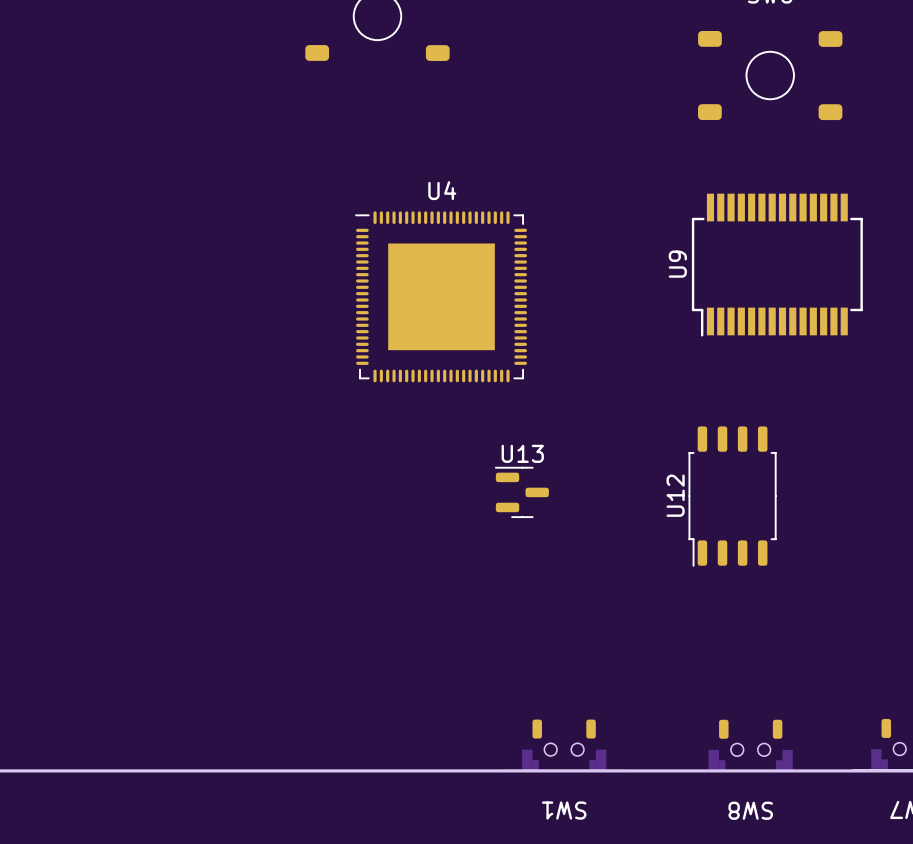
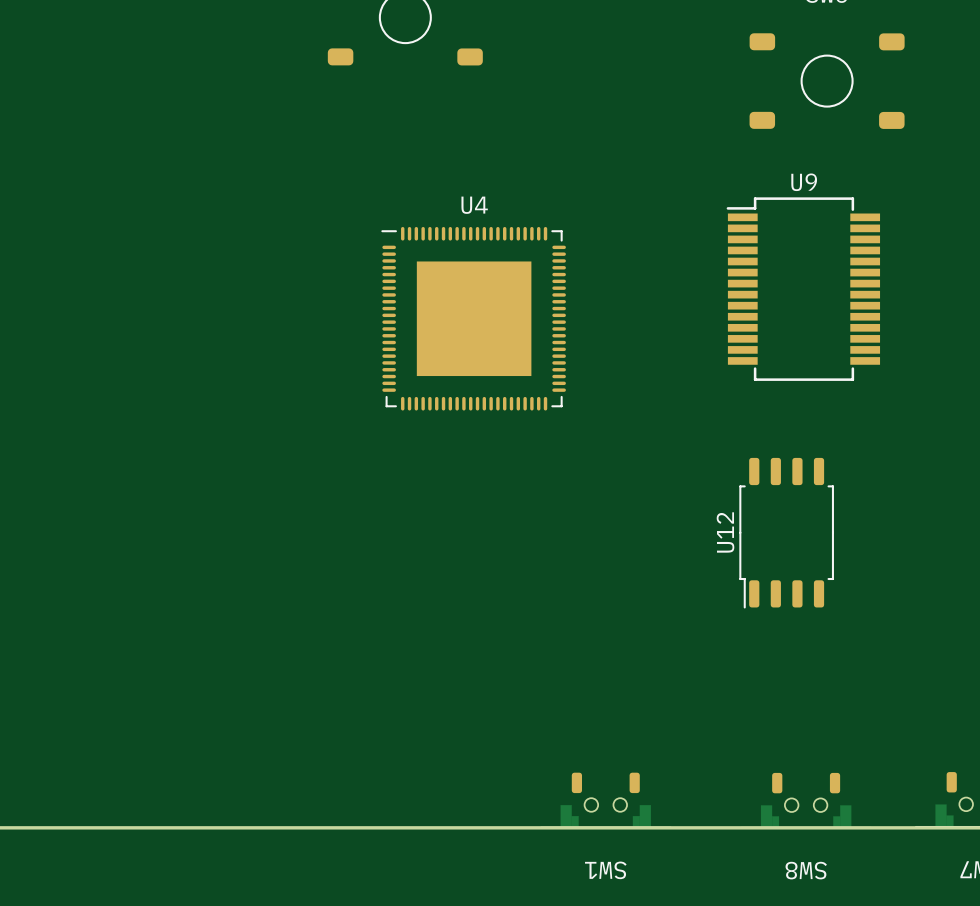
U9 rotation: 0° (777, 265) -> 90° clockwise (803, 289)
U13: (521, 492) -> none

